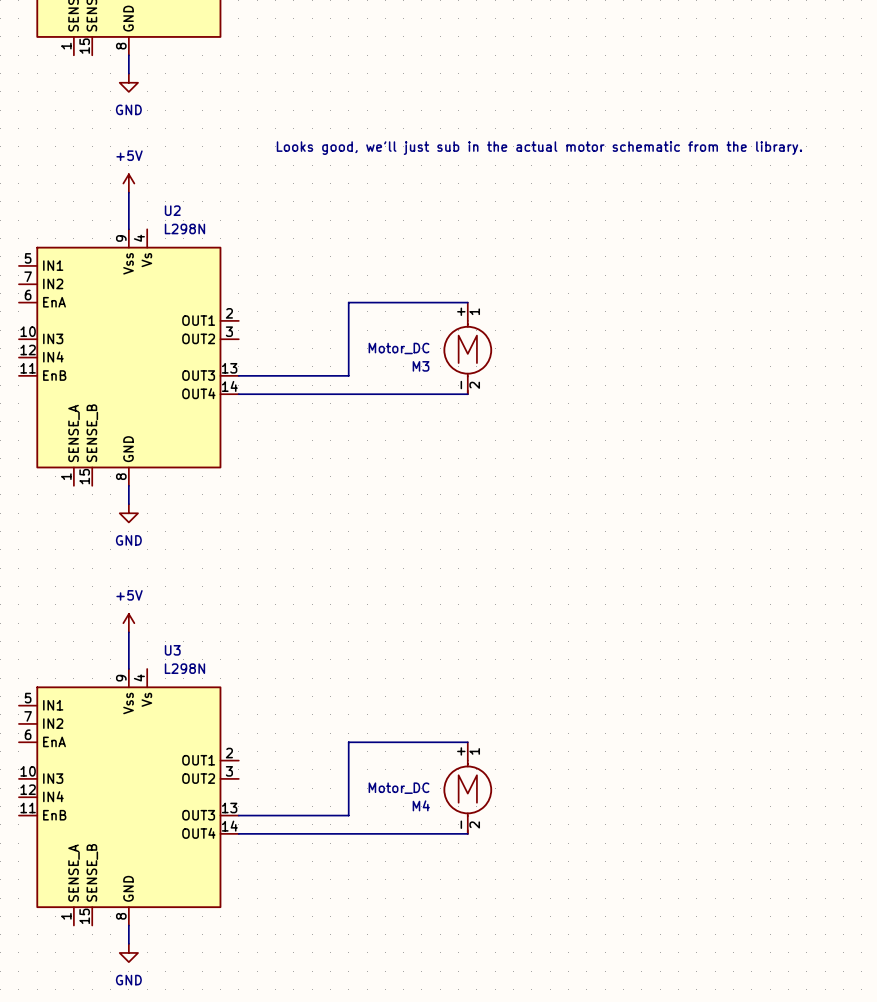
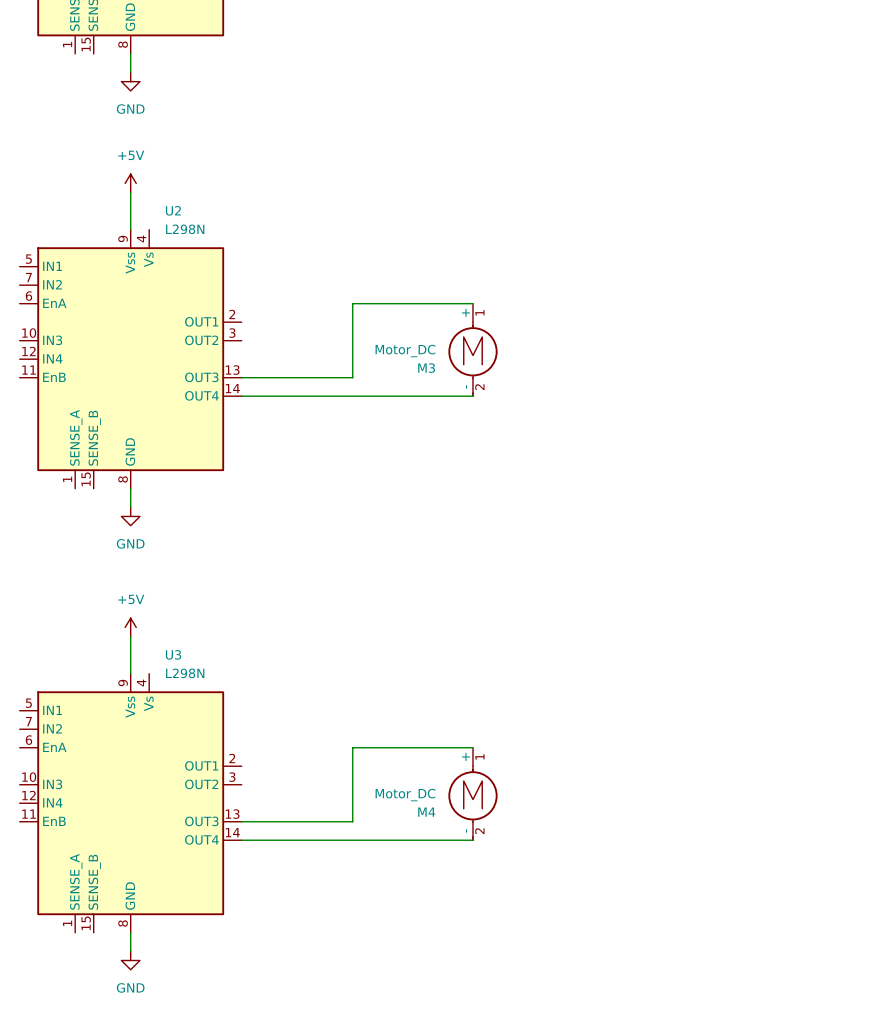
text: Looks good, we'll just sub in the actual motor schematic from the library. (539, 148) -> none

